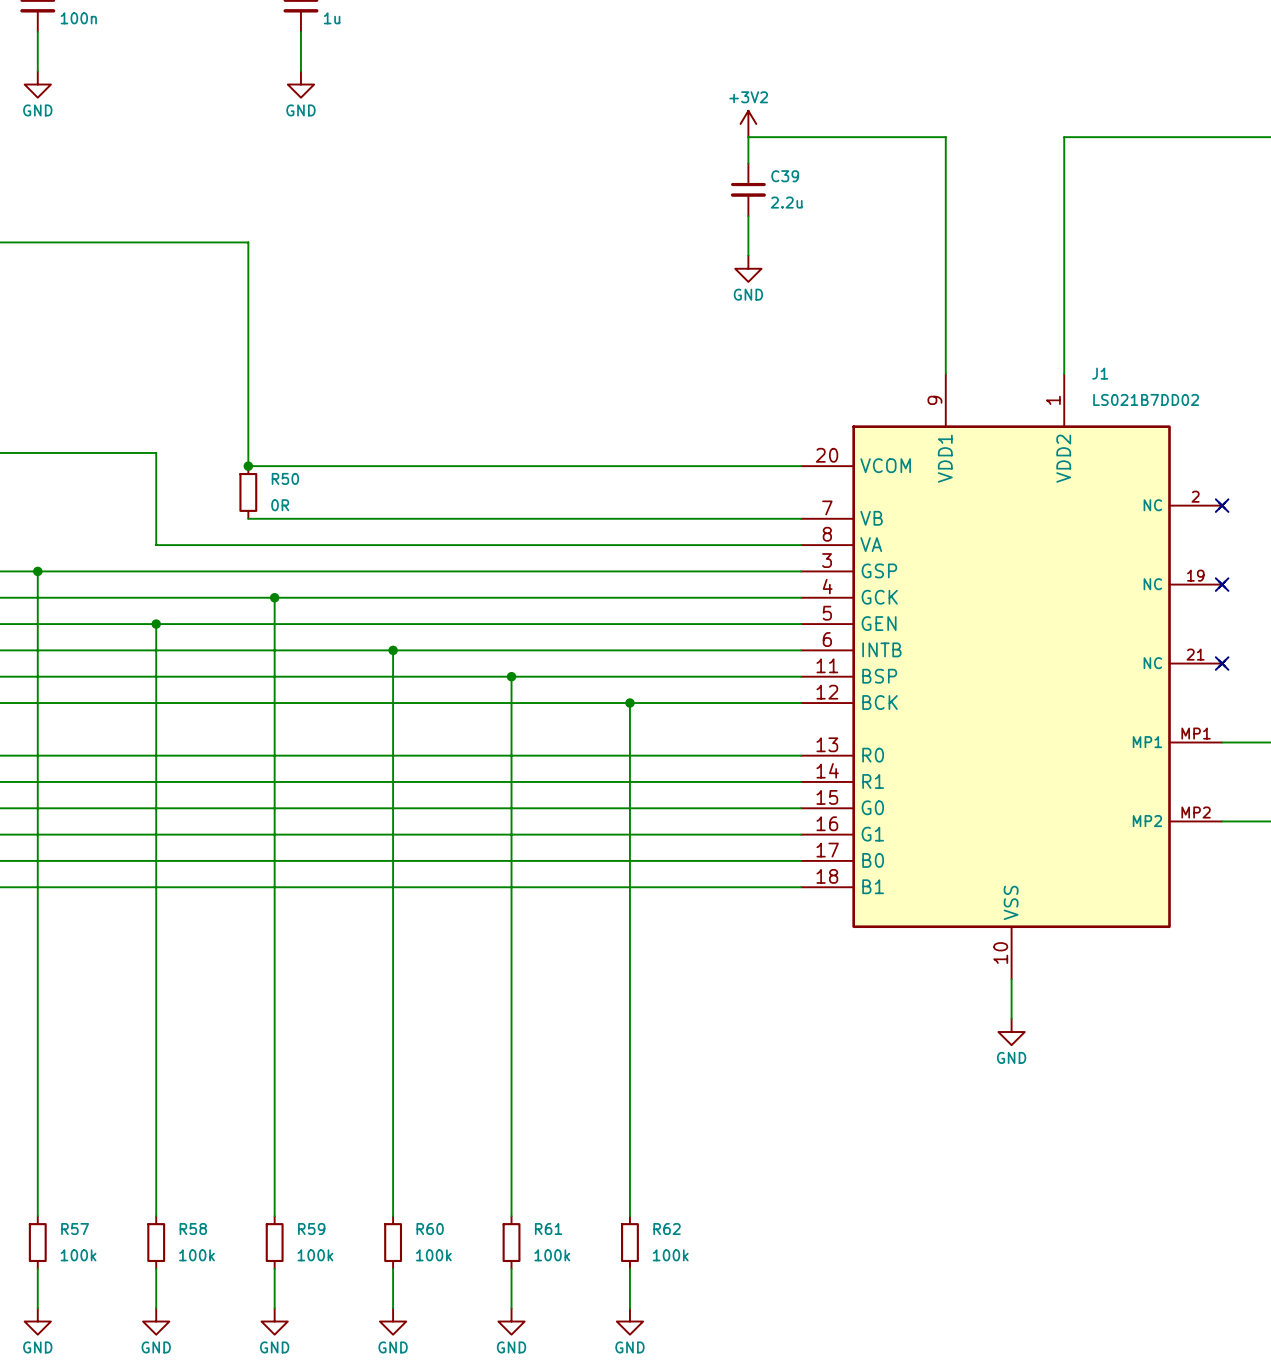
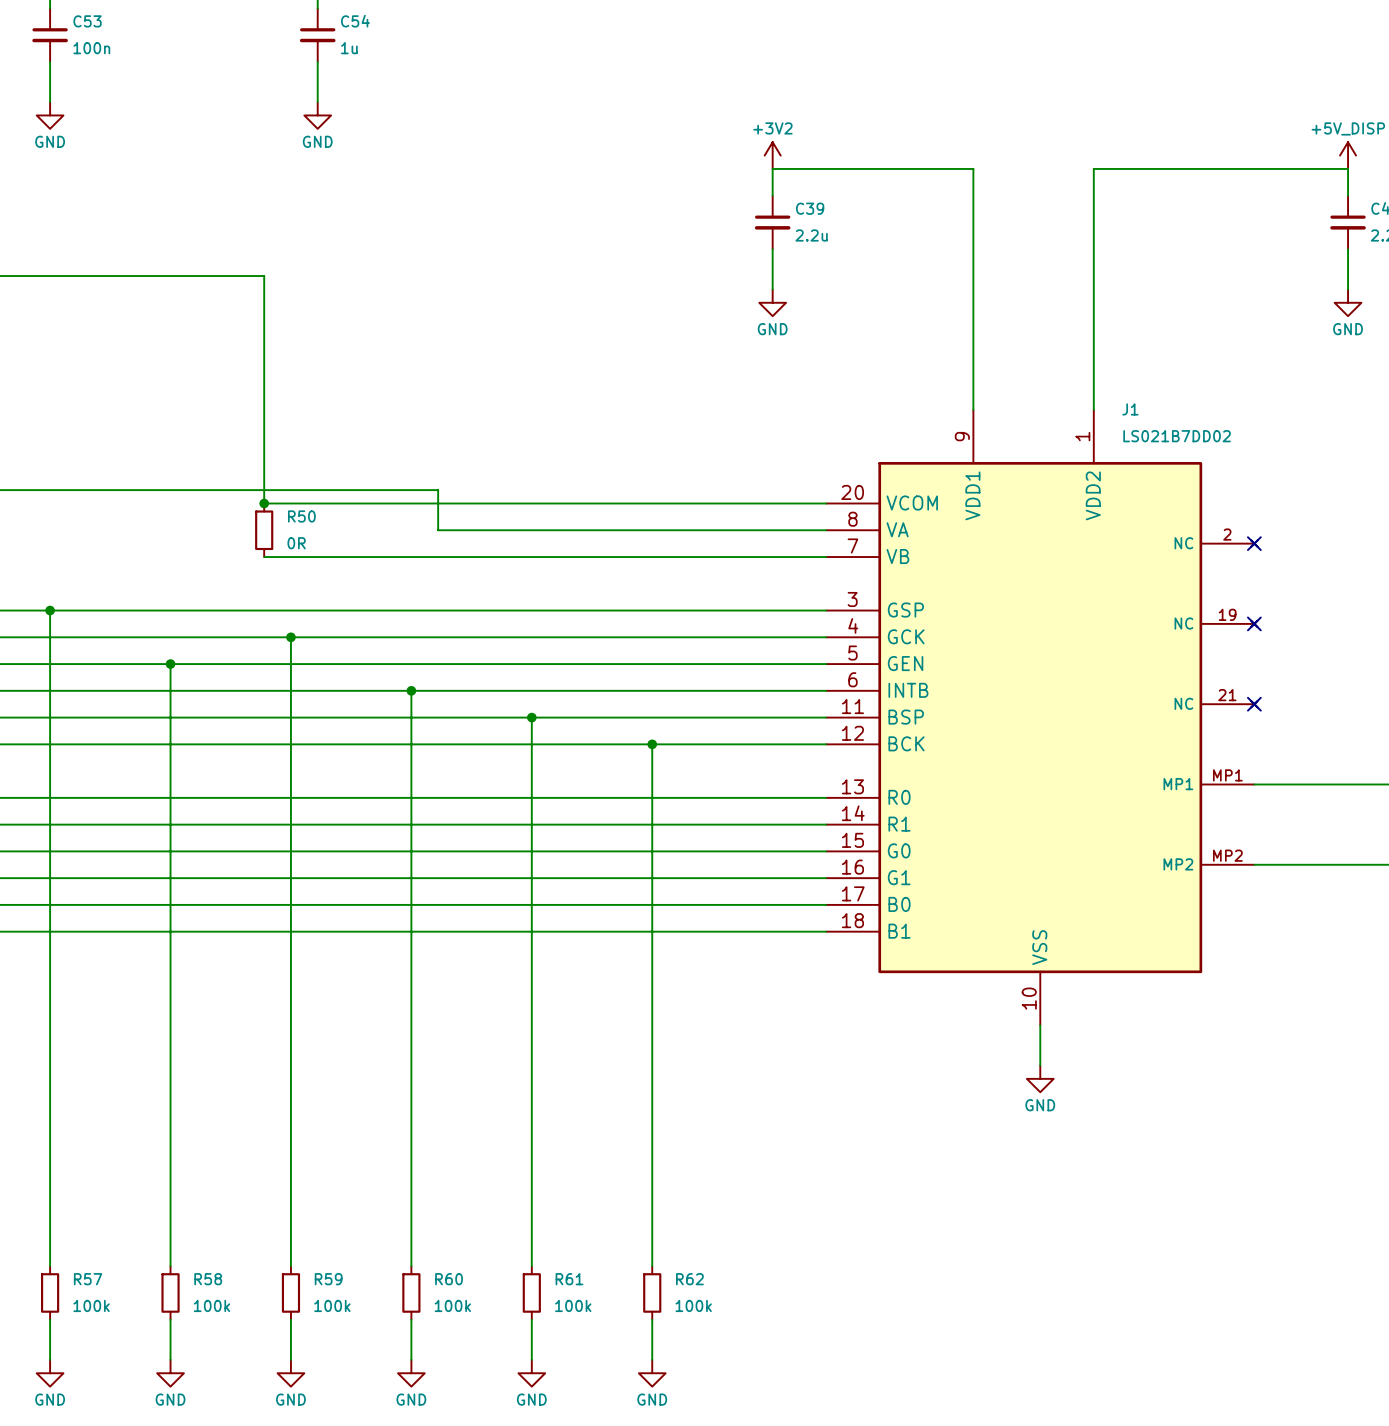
J1 symbol: [801, 374, 1226, 980] -> [826, 409, 1258, 1026]
wire: (156, 452) (156, 545) (801, 545) -> (170, 490) (438, 490) (438, 530) (826, 530)

